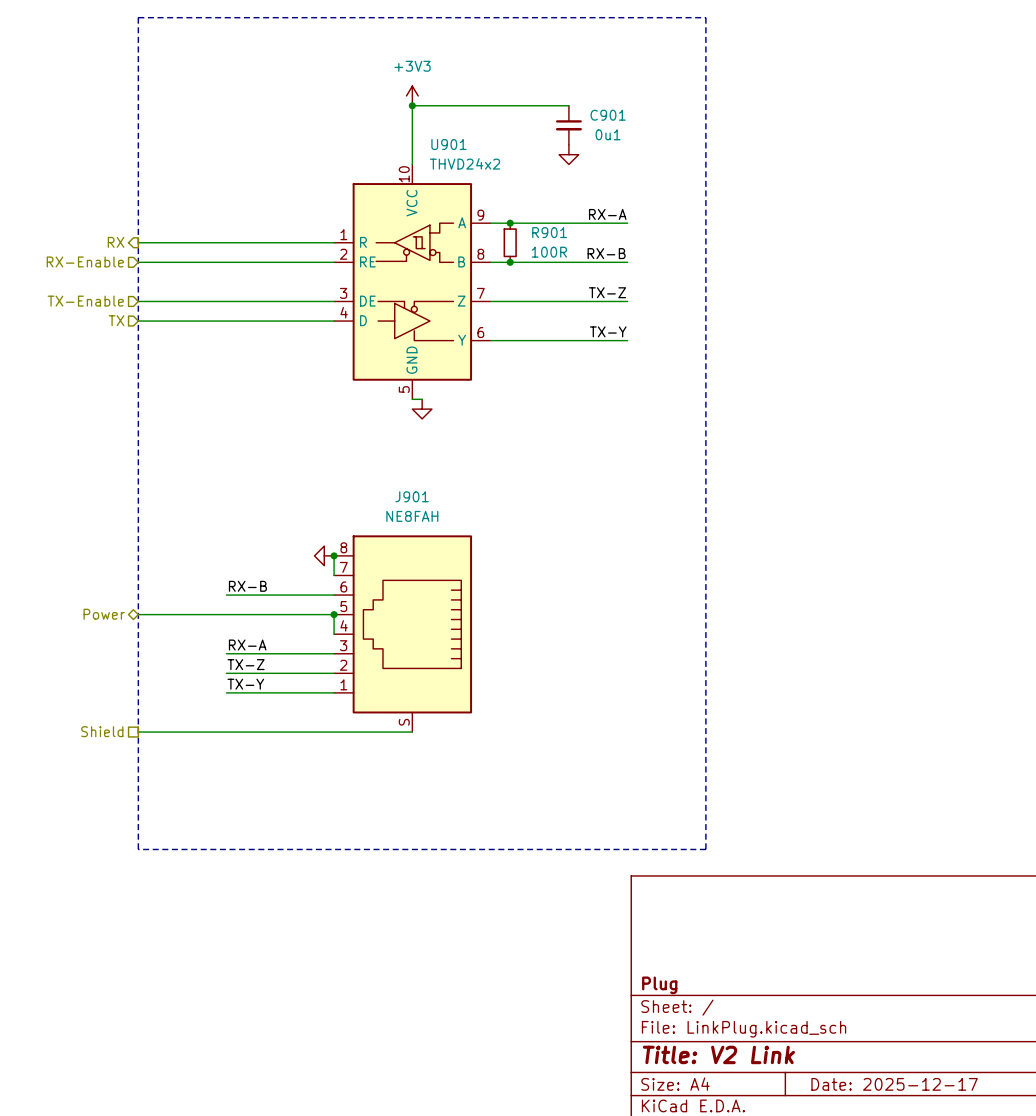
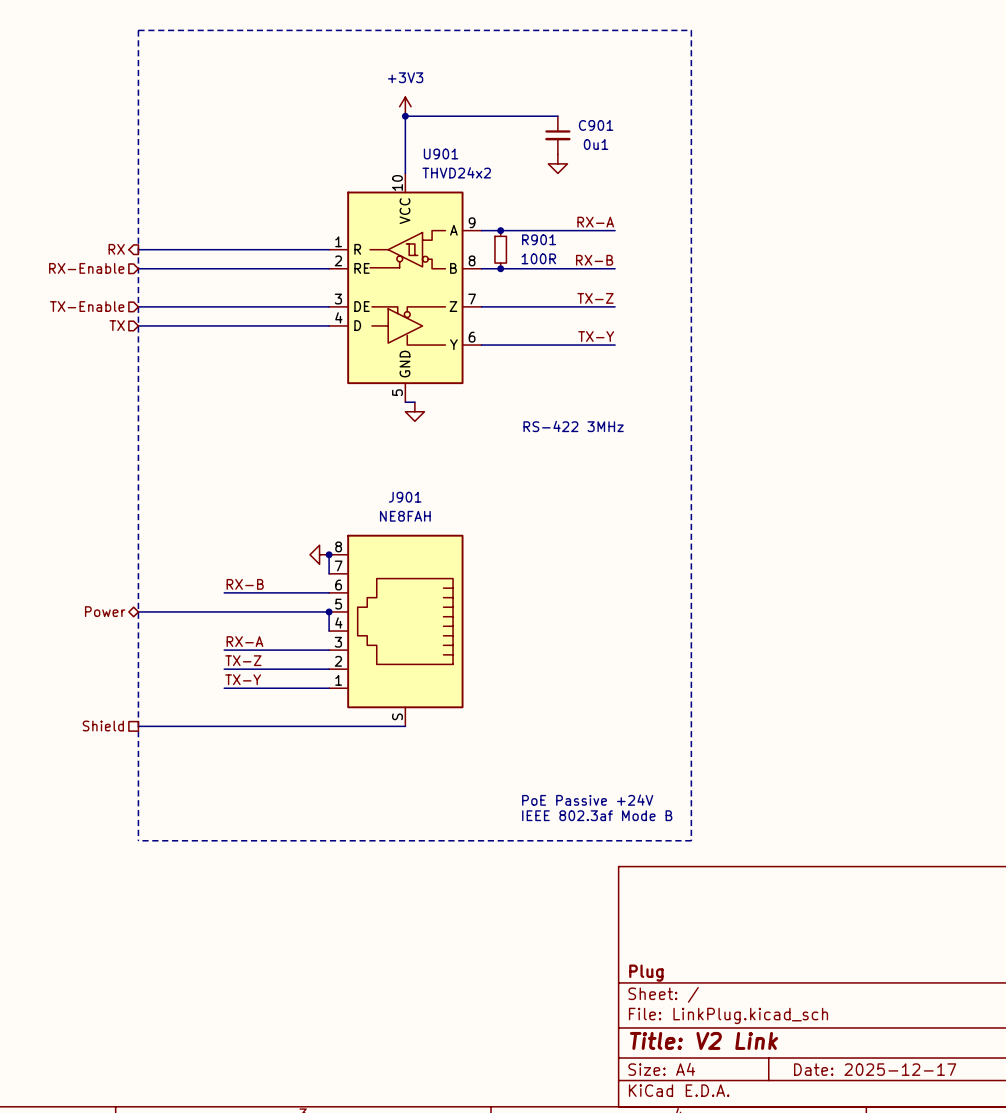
text: none -> RS-422 3MHz (573, 426)
text: none -> PoE Passive +24V (587, 800)
text: none -> IEEE 802.3af Mode B (597, 815)

